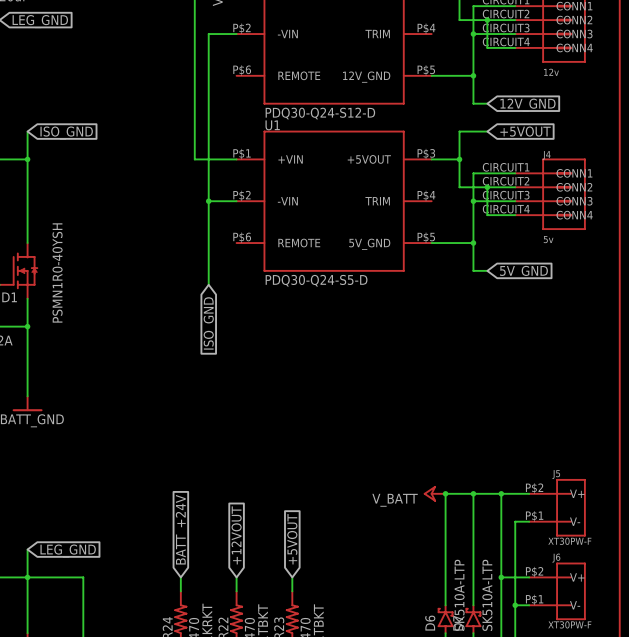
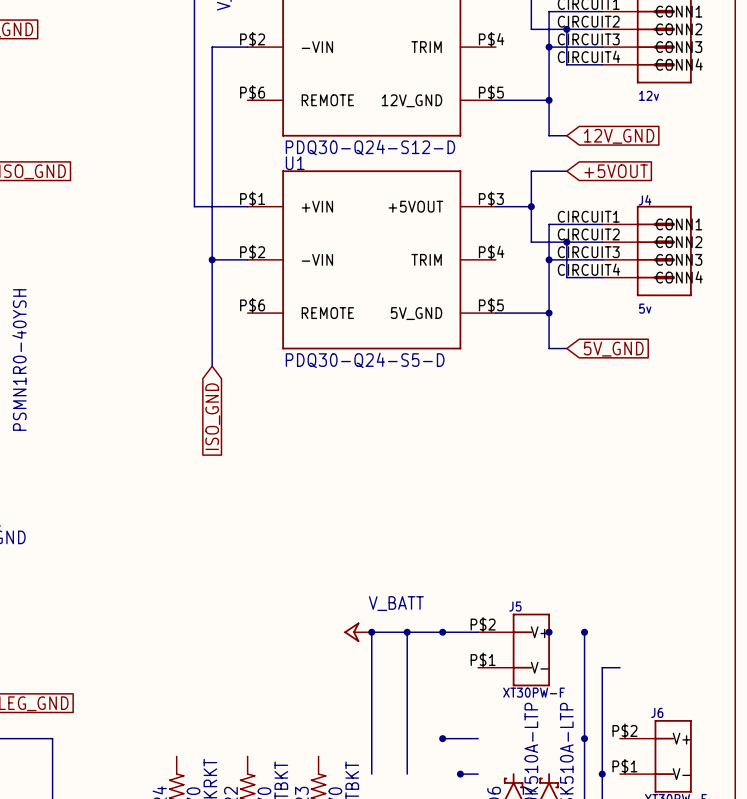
junction: none -> (371, 632)
junction: none -> (407, 632)
junction: none -> (442, 632)
power symbol position: V_BATT (434, 493) -> V_BATT (358, 632)
junction: (445, 493) -> none
wire: (473, 493) (473, 605) -> (407, 632) (407, 774)
wire: (529, 493) (445, 493) (445, 605) -> (478, 632) (371, 632) (371, 774)
power symbol text position: V_BATT (395, 500) -> V_BATT (396, 603)
J5 position: (557, 507) -> (514, 649)
global label: BATT_+24V (182, 529) -> none
global label: +12VOUT (236, 535) -> none
global label: +5VOUT (292, 539) -> none
wire: (180, 577) (180, 591) -> none
wire: (236, 577) (236, 591) -> none
wire: (292, 577) (292, 591) -> none
junction: none -> (442, 738)
wire: (501, 577) (529, 577) -> (442, 738) (478, 738)
junction: none -> (460, 774)
wire: (515, 605) (529, 605) -> (460, 774) (478, 774)

